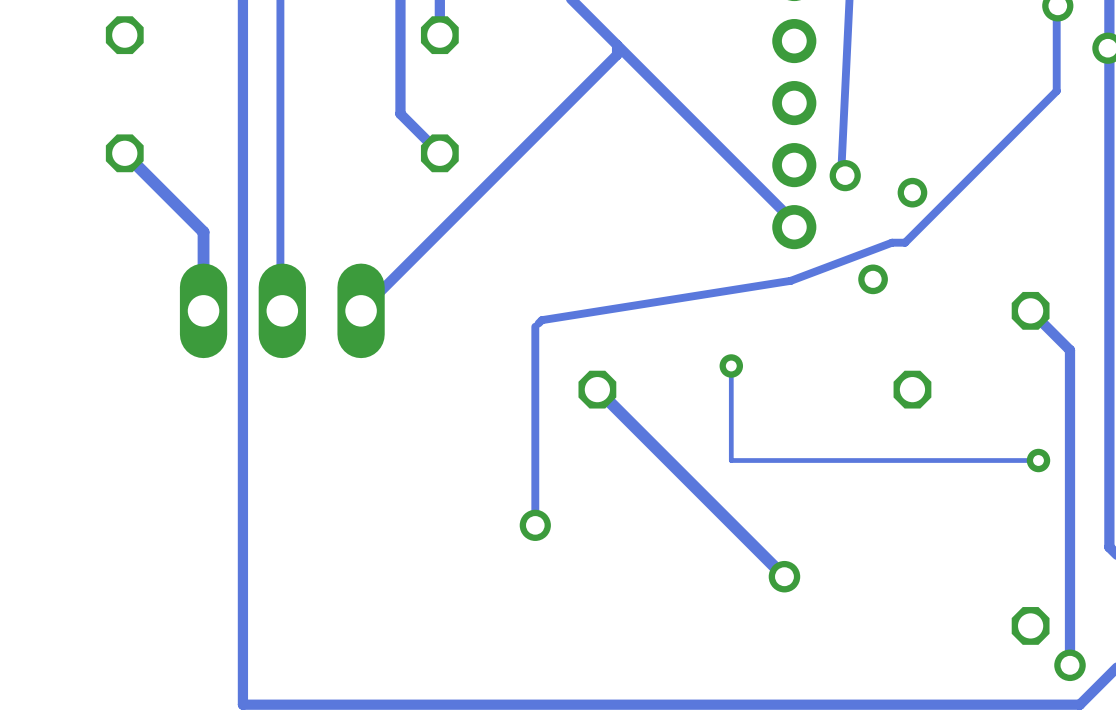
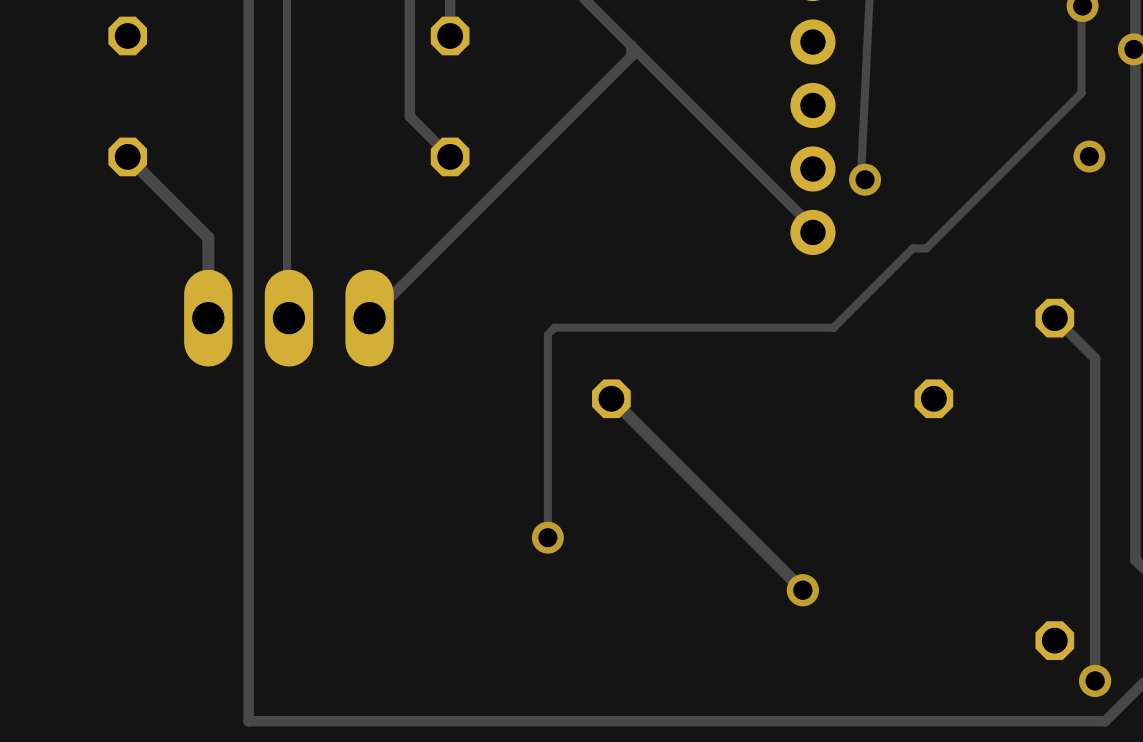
via: none -> (1089, 156)
via: (912, 192) -> none
track: (892, 242) (790, 280) (541, 320) -> (912, 248) (833, 327) (554, 327)
via: (873, 279) -> none
track: (731, 365) (731, 460) (1038, 460) -> none
via: (731, 365) -> none
via: (1038, 460) -> none

